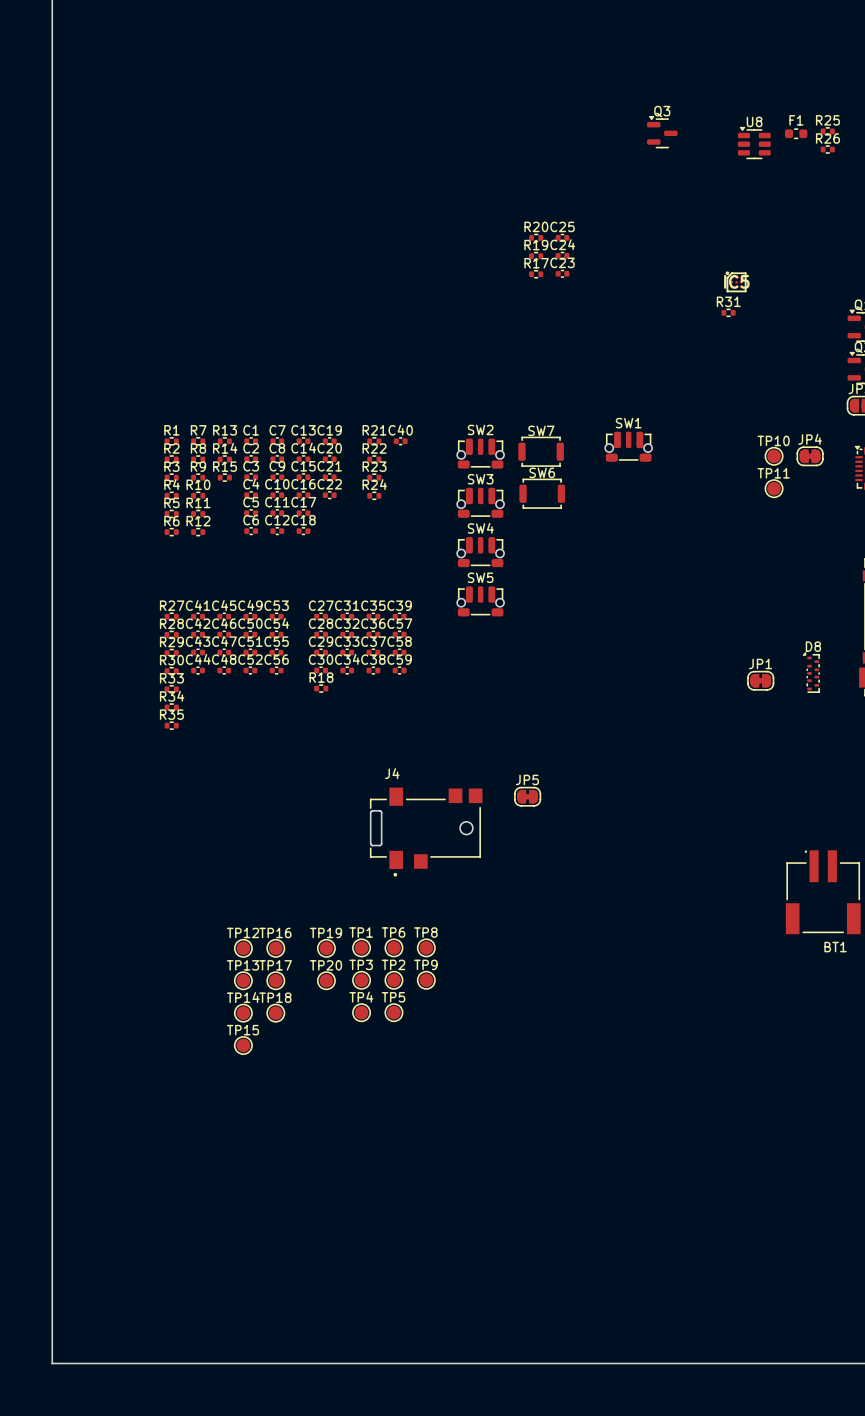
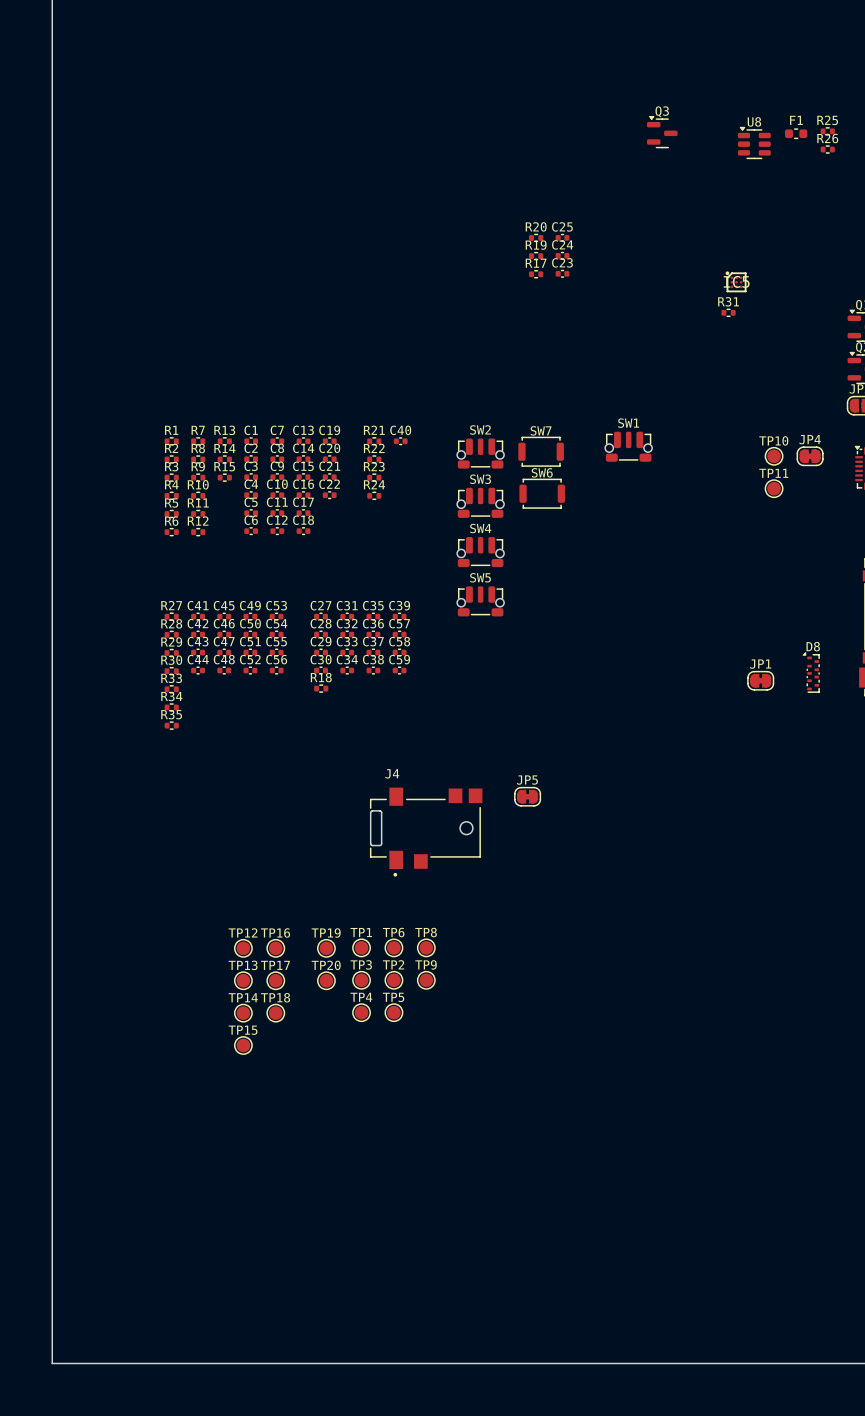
BT1: (823, 892) -> none

